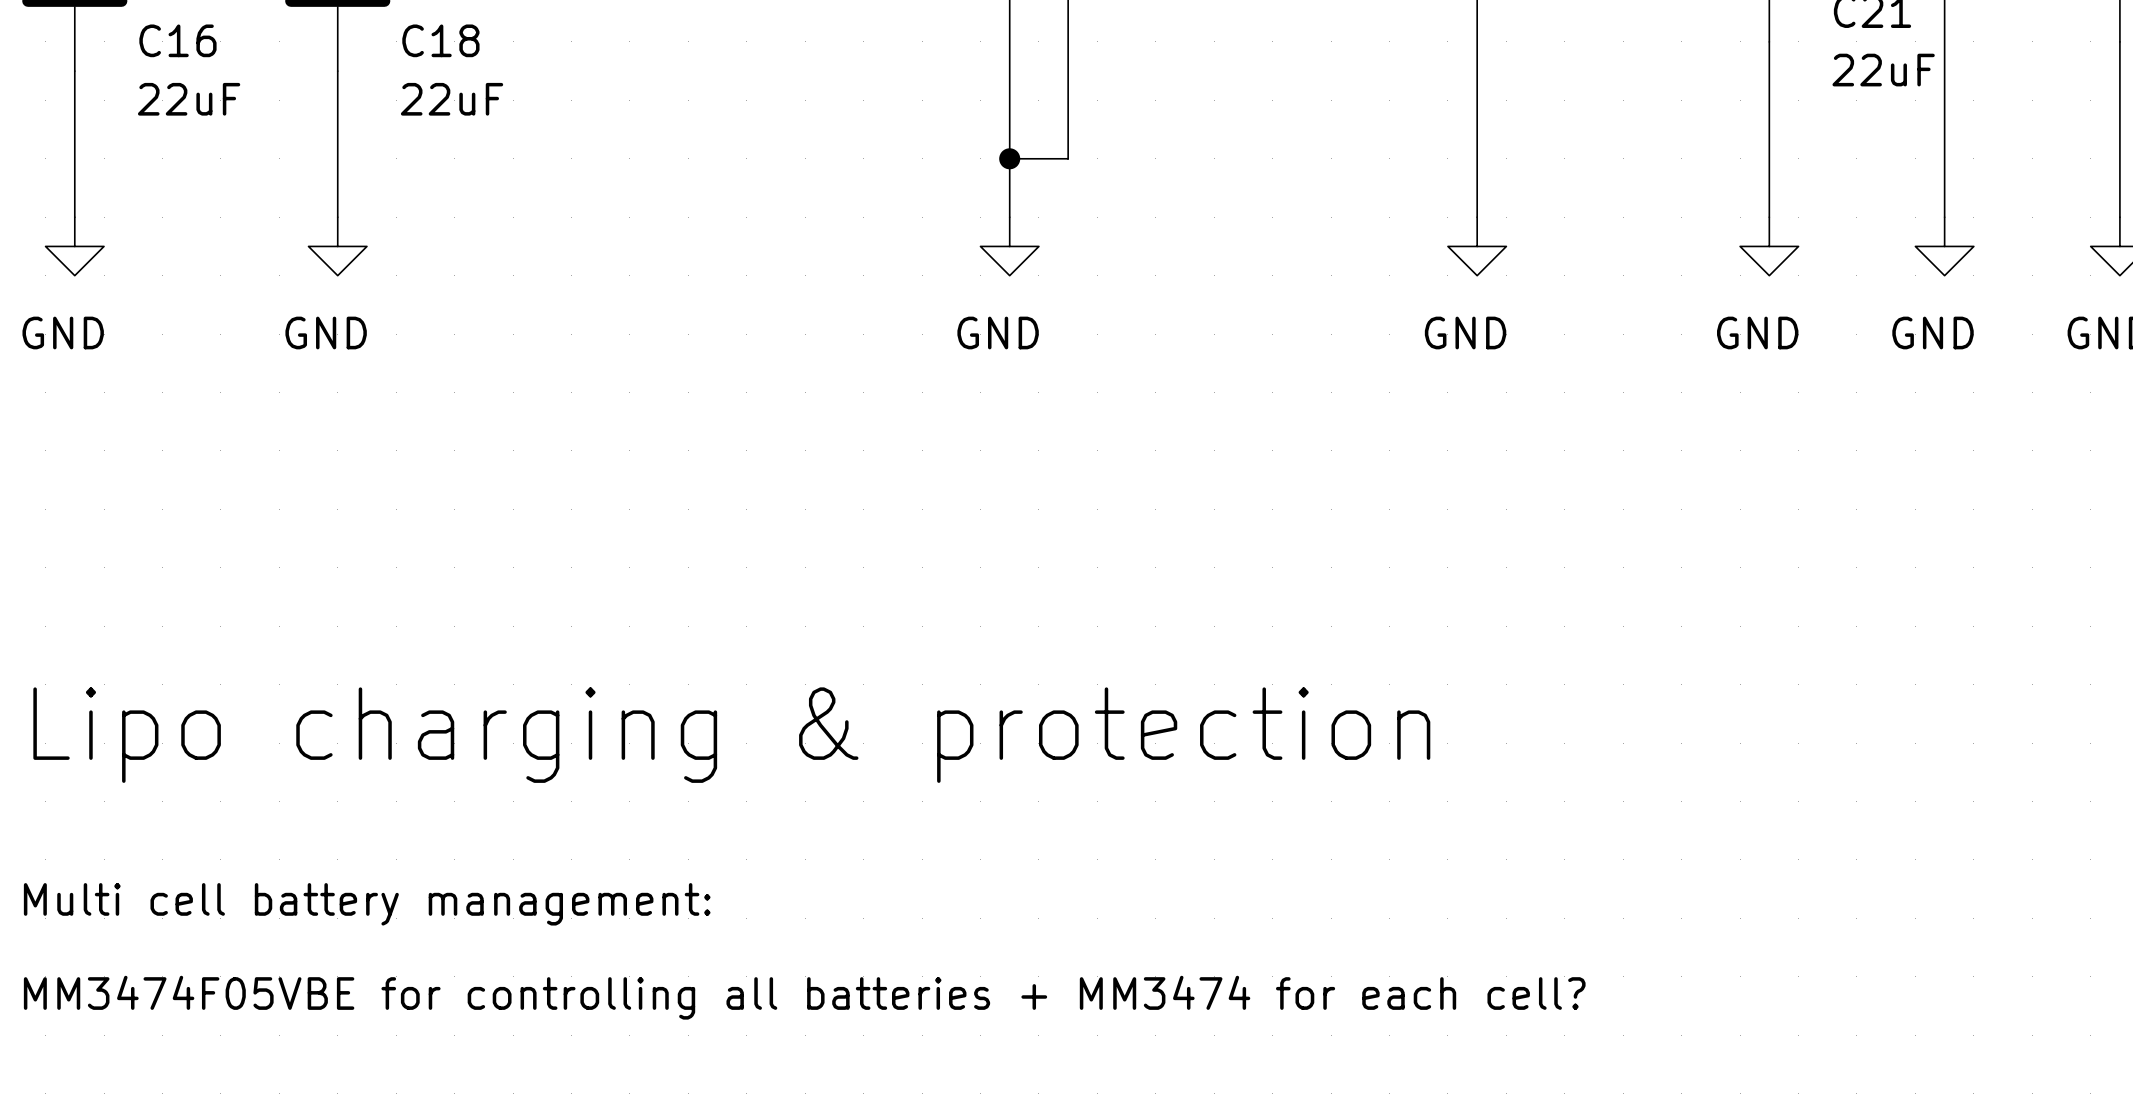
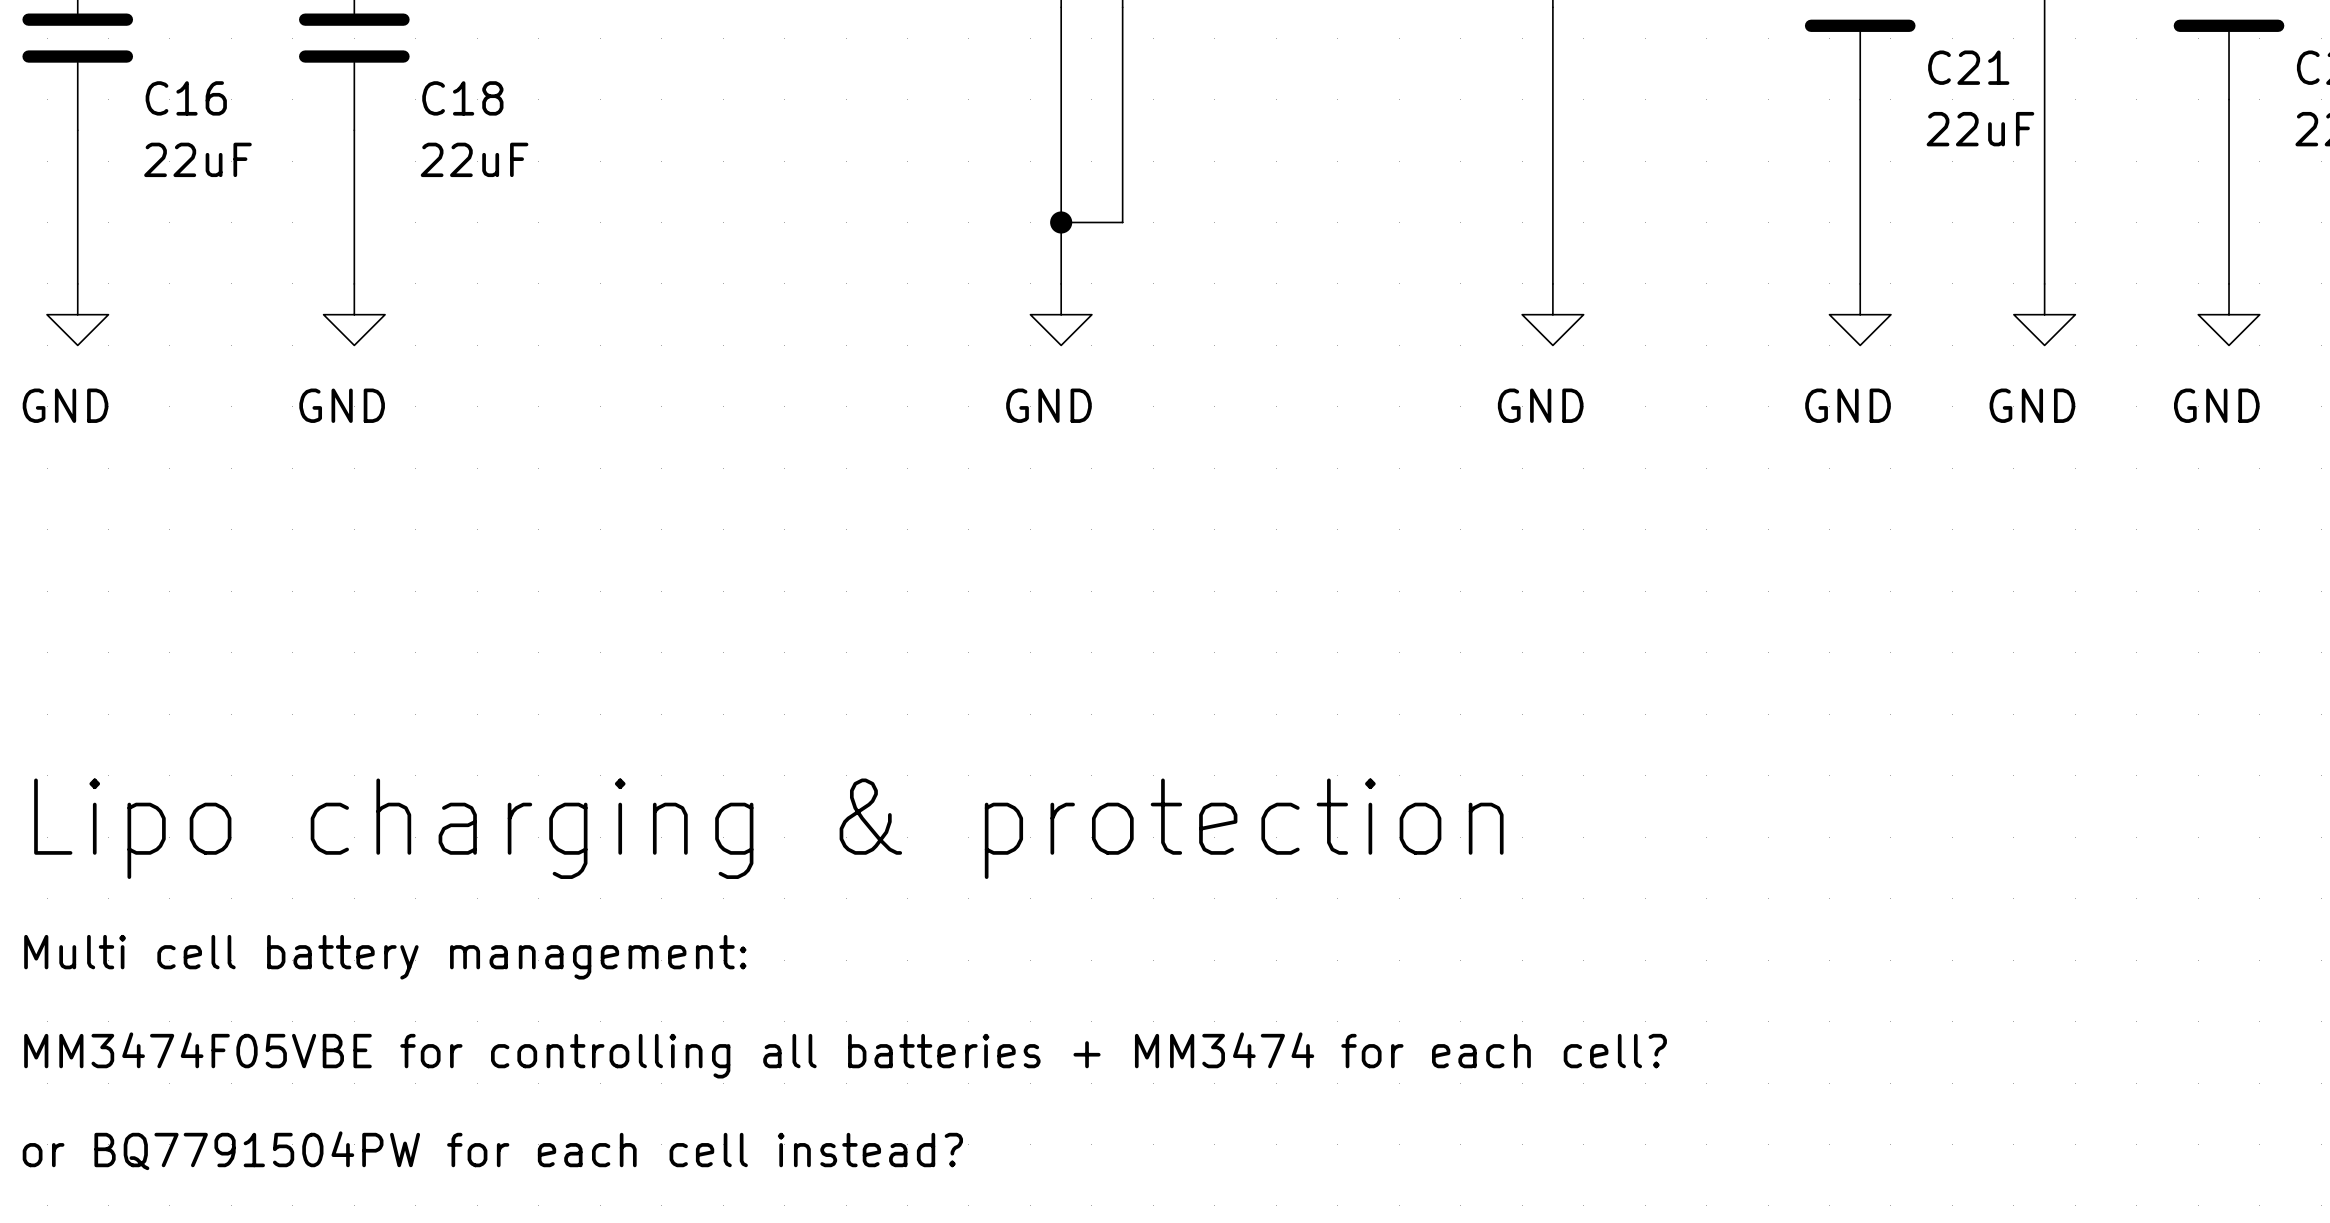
text position: Multi cell battery management: (367, 904) -> Multi cell battery management: (385, 957)
text position: MM3474F05VBE for controlling all batteries + MM3474 for each cell? (804, 997) -> MM3474F05VBE for controlling all batteries + MM3474 for each cell? (845, 1055)
text: none -> or BQ7791504PW for each cell instead? (492, 1150)

